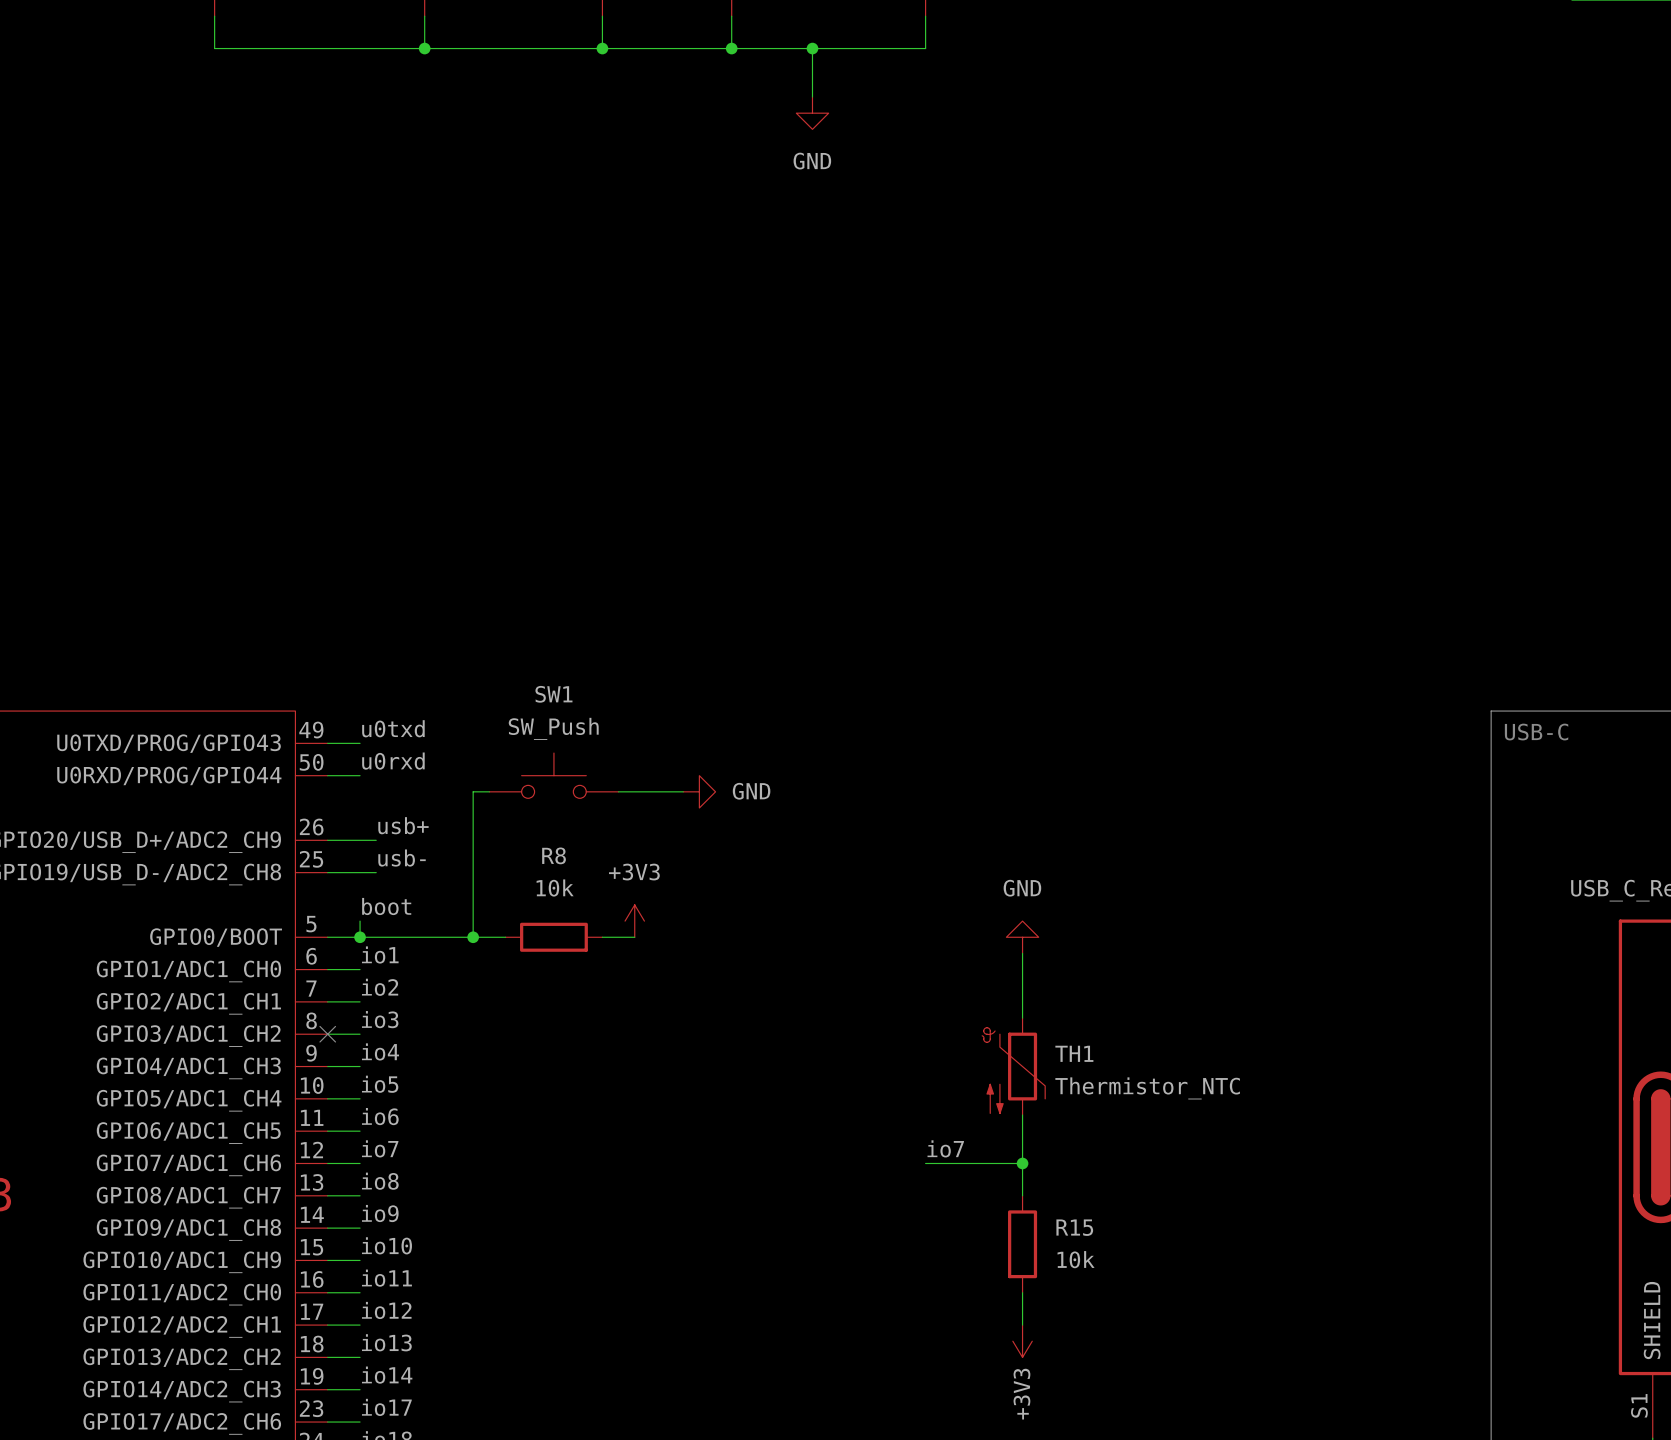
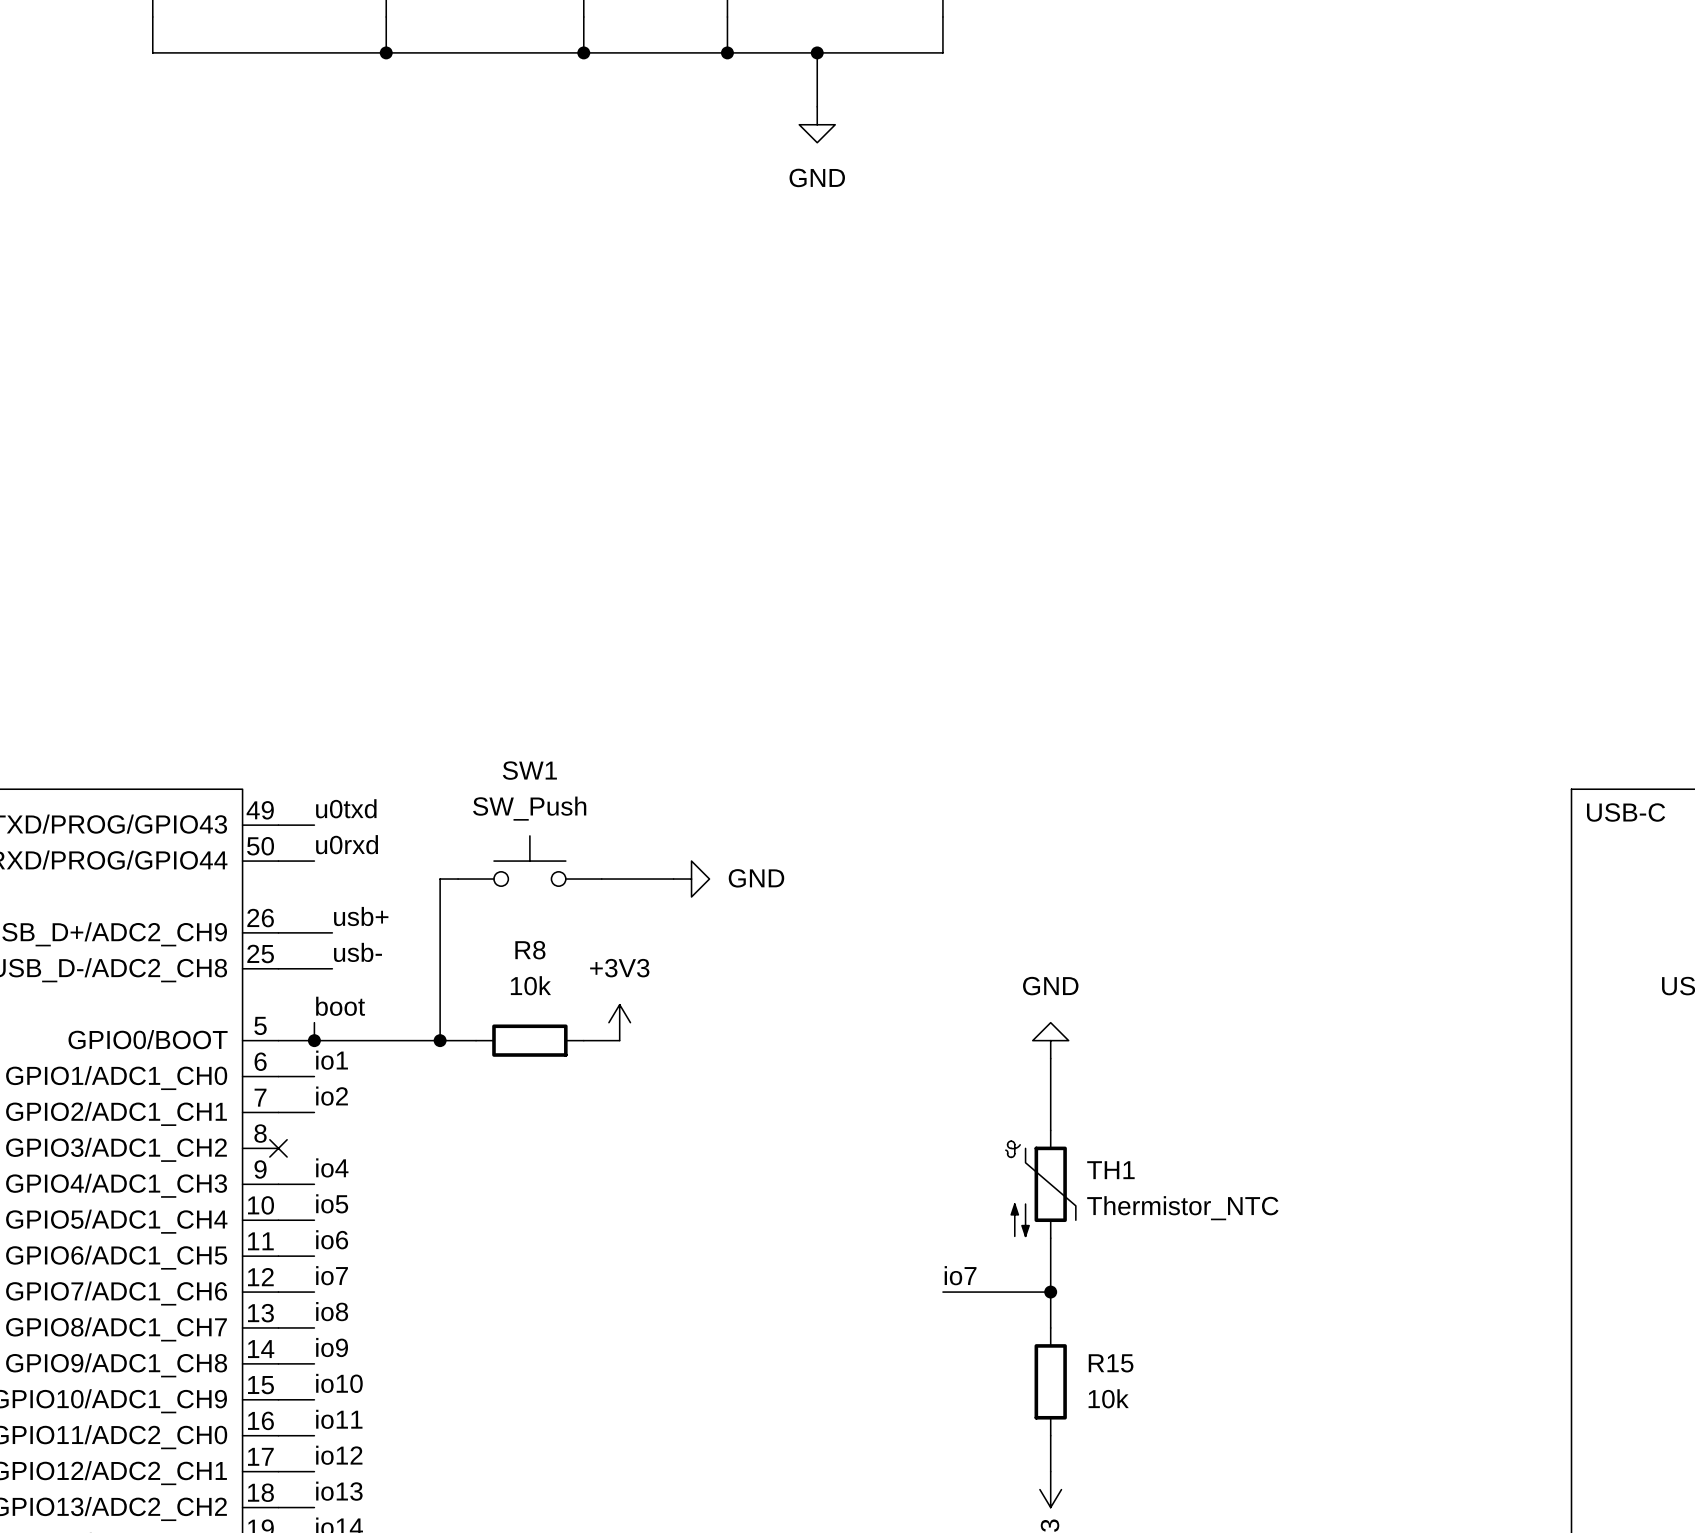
label: io3 (380, 1019) -> none
wire: (327, 1034) (360, 1034) -> none

